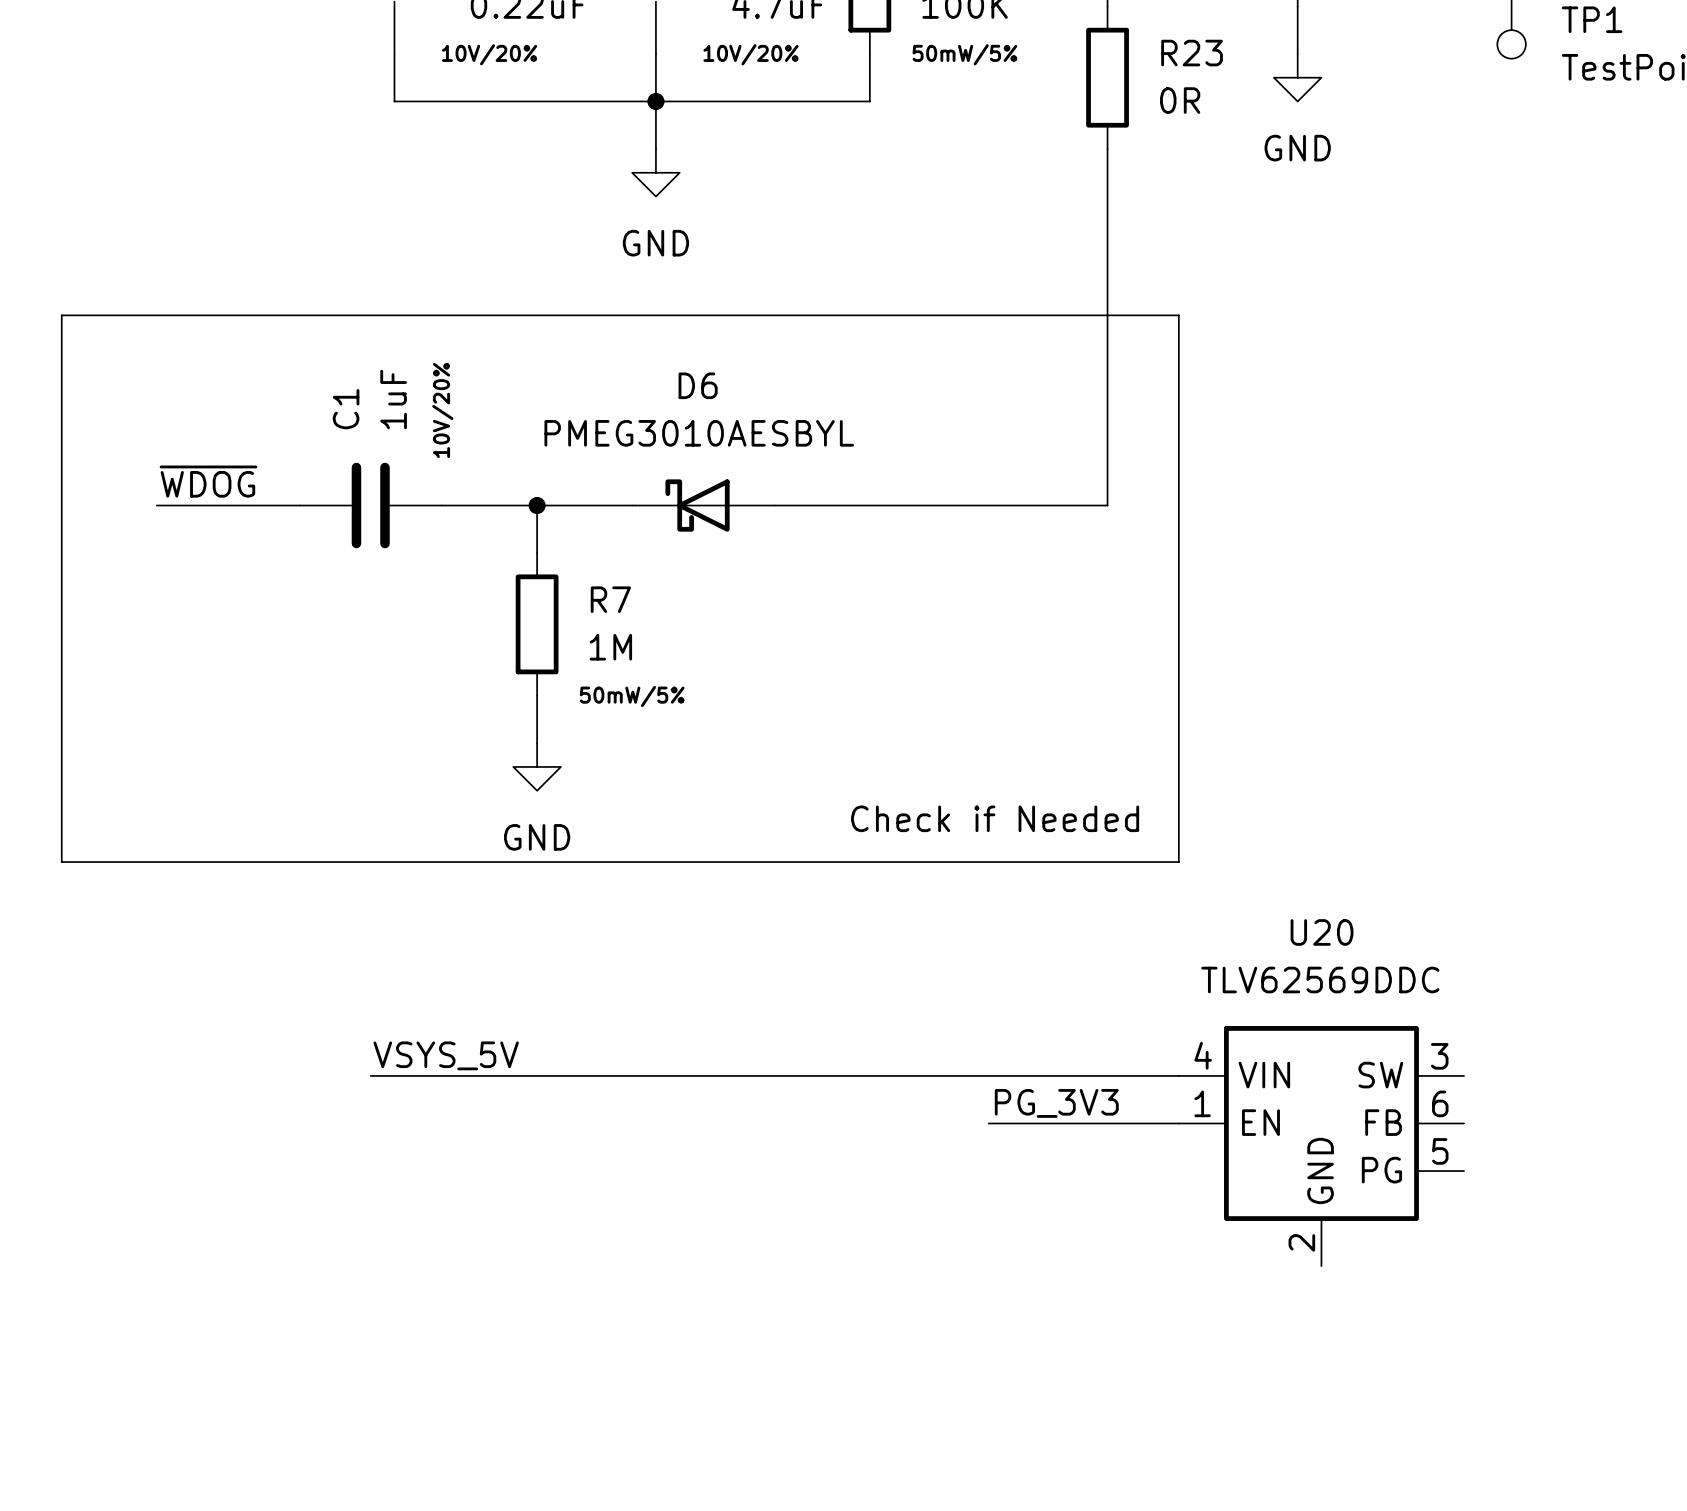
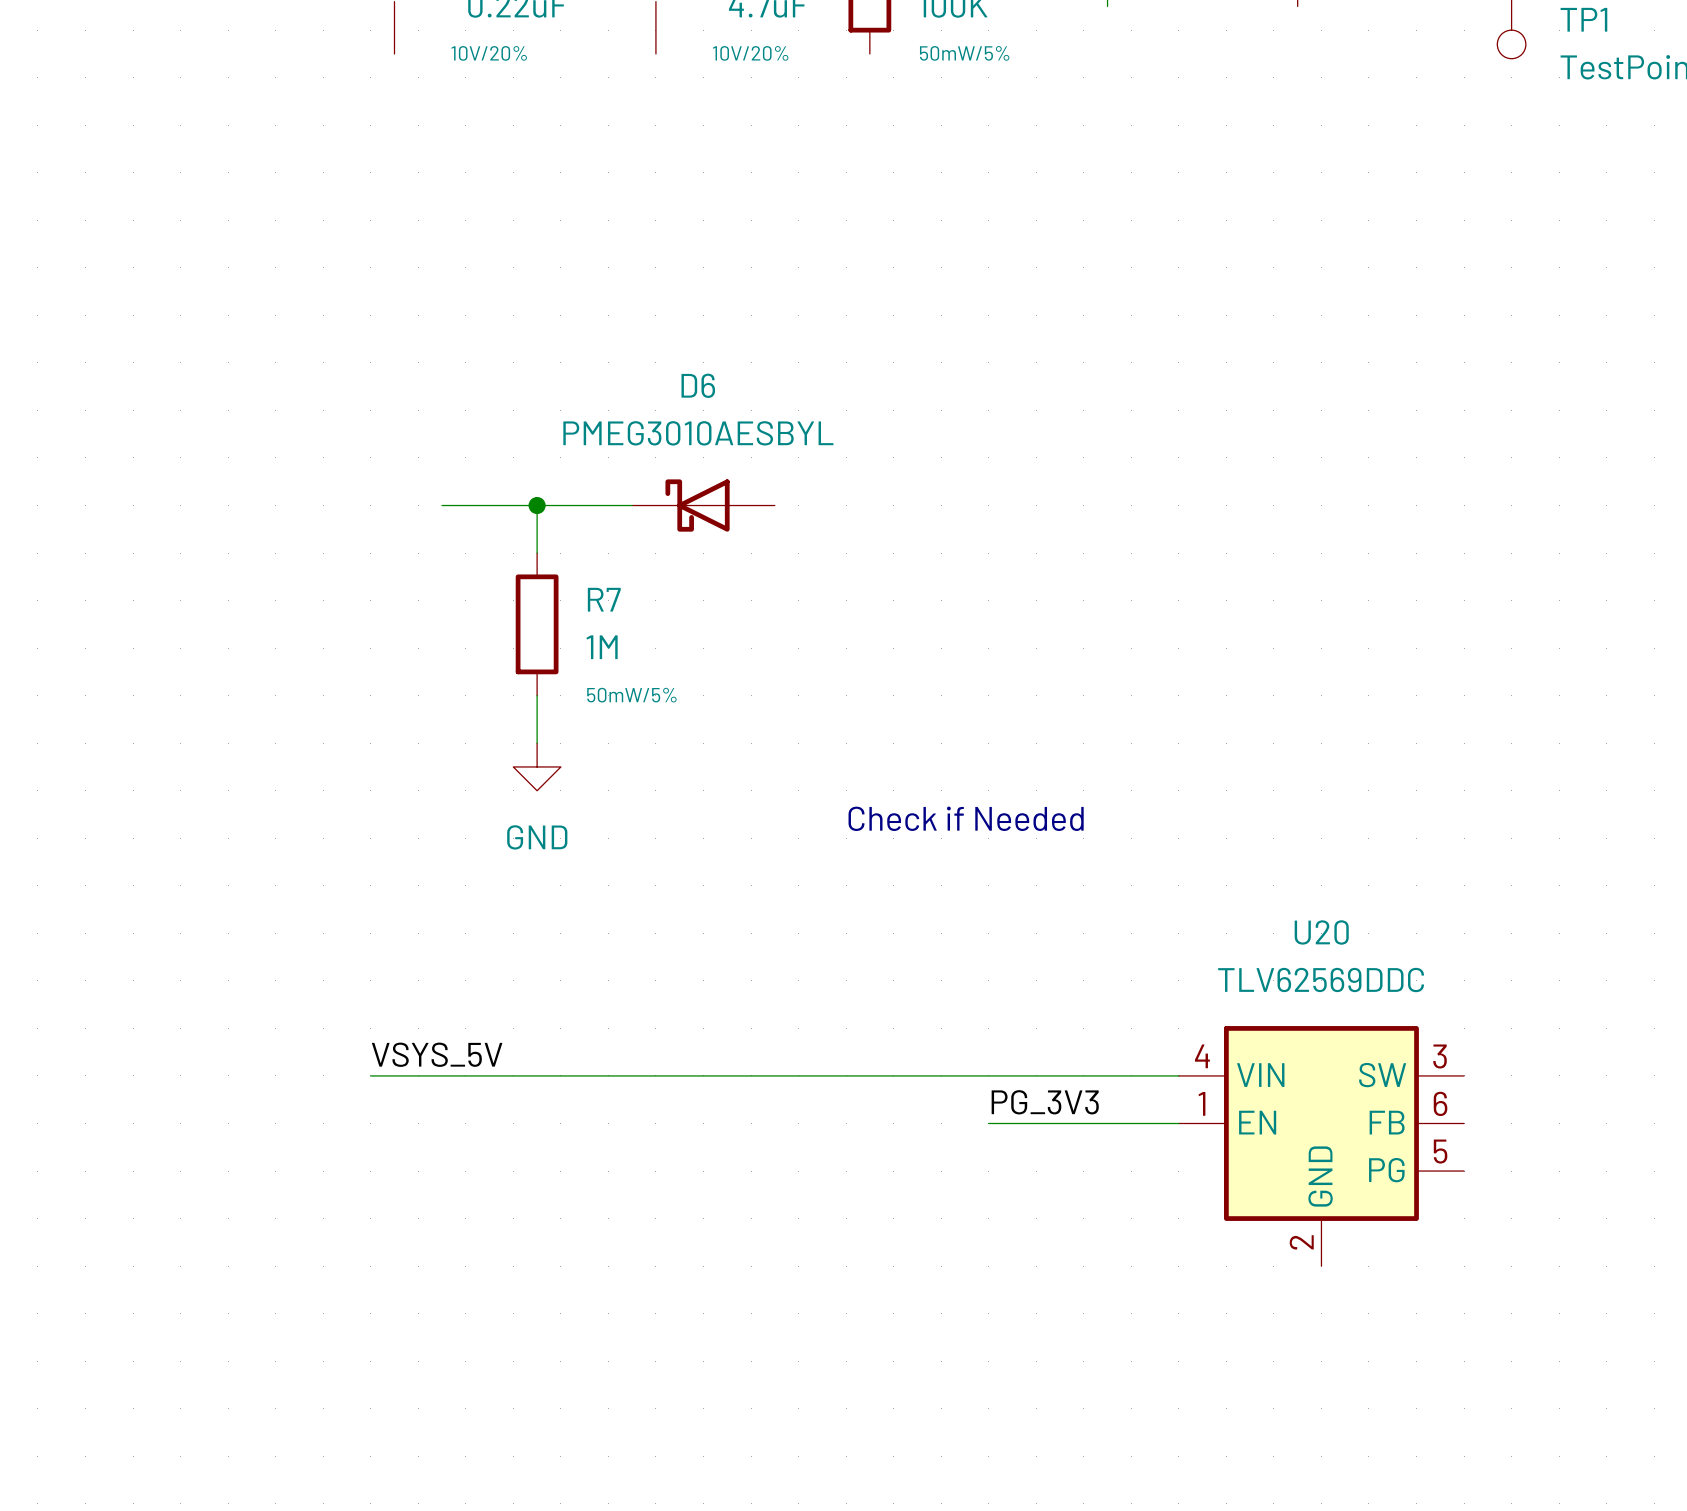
wire: (1297, 6) (1297, 53) -> none
wire: (394, 53) (394, 101) (869, 101) (869, 53) -> none
wire: (655, 53) (655, 149) -> none
R23: 0R (1107, 77) -> none
power symbol: GND (1297, 77) -> none
junction: (655, 101) -> none
wire: (1107, 149) (1107, 505) (774, 505) -> none
power symbol: GND (655, 172) -> none
line: (61, 315) (61, 862) (1178, 862) (1178, 315) (61, 315) -> none
label: ~{WDOG} (208, 481) -> none
wire: (156, 505) (299, 505) -> none
C1: 1uF (370, 505) -> none

